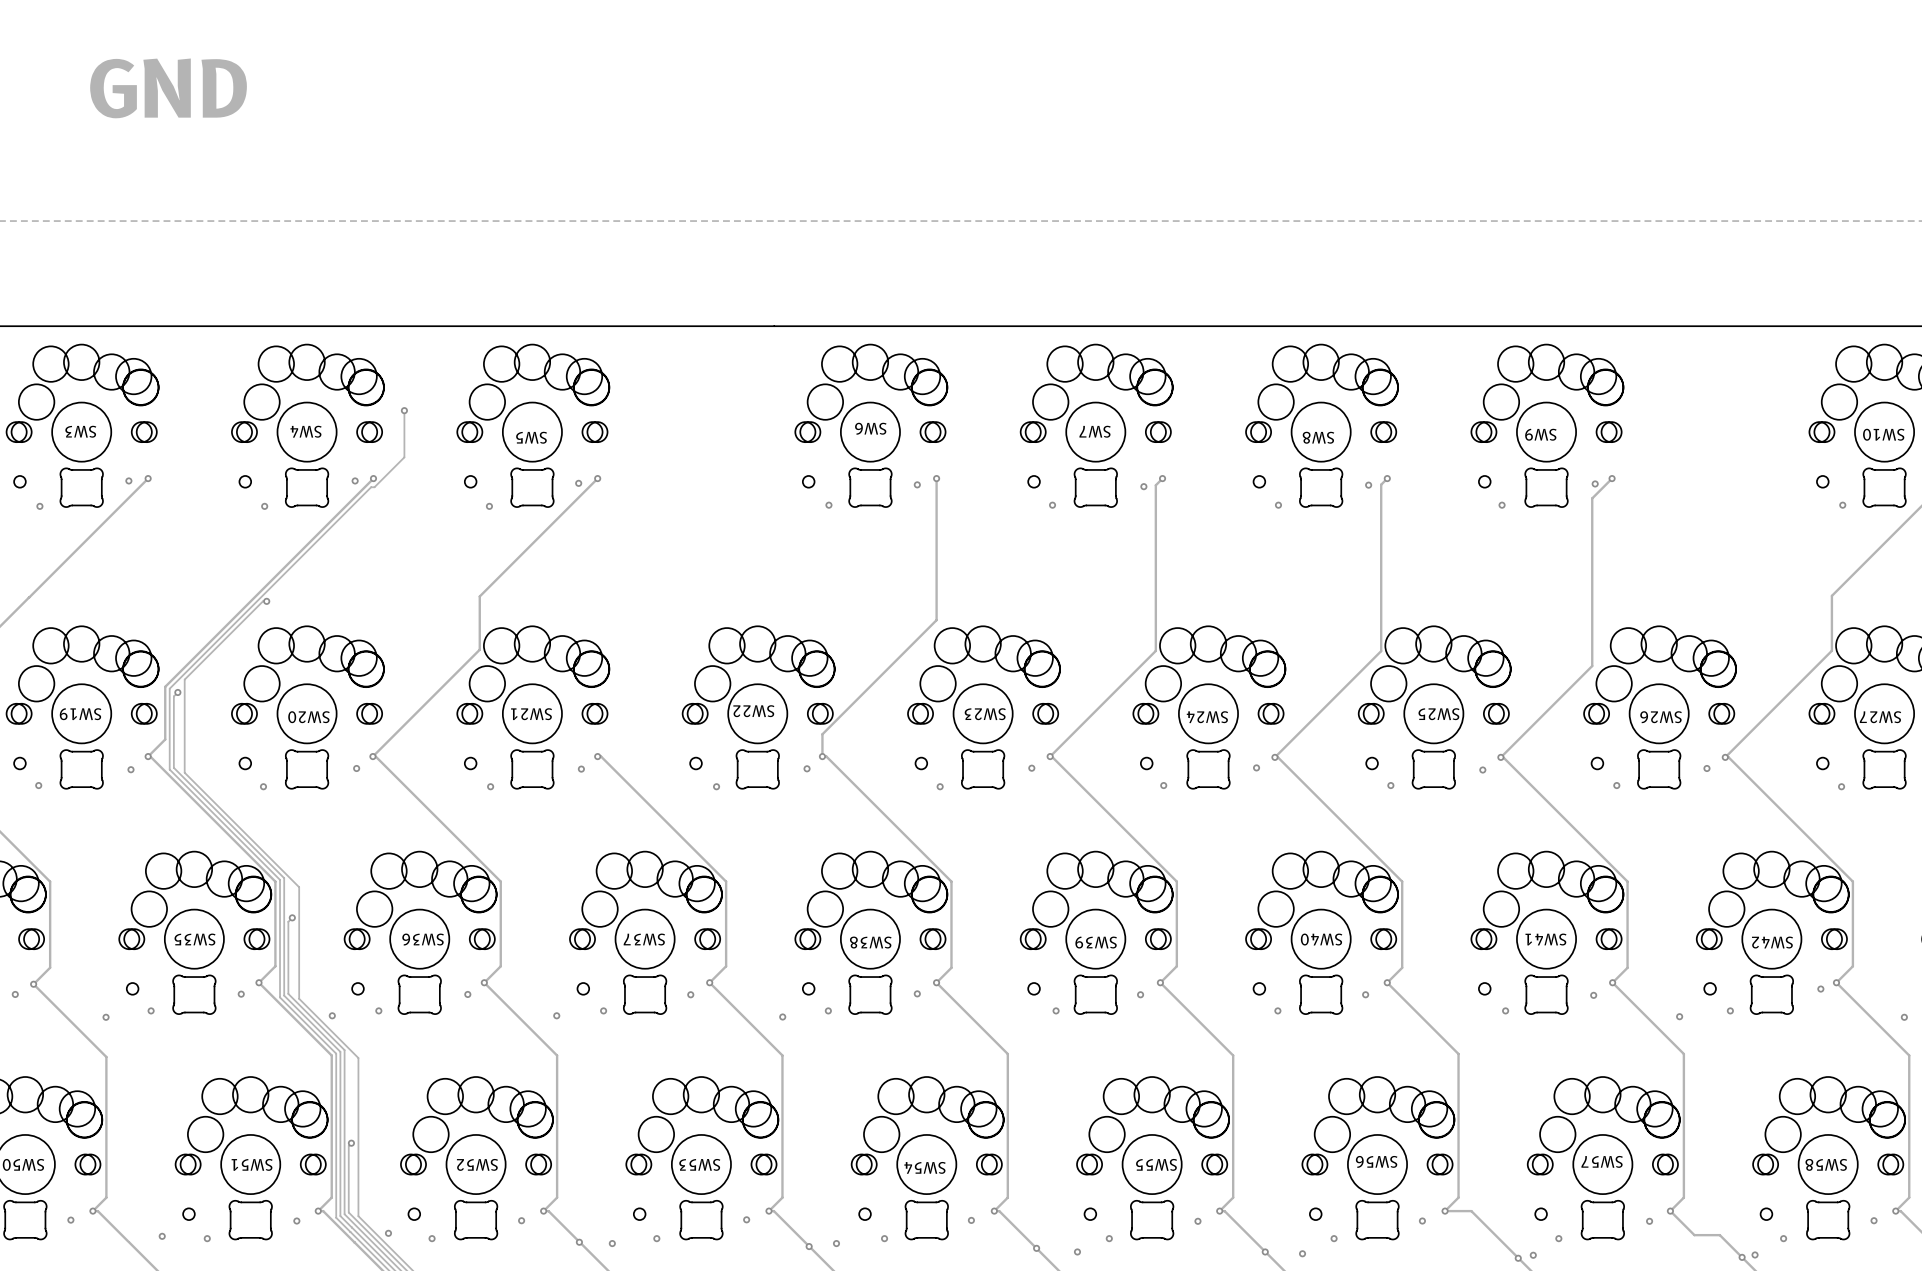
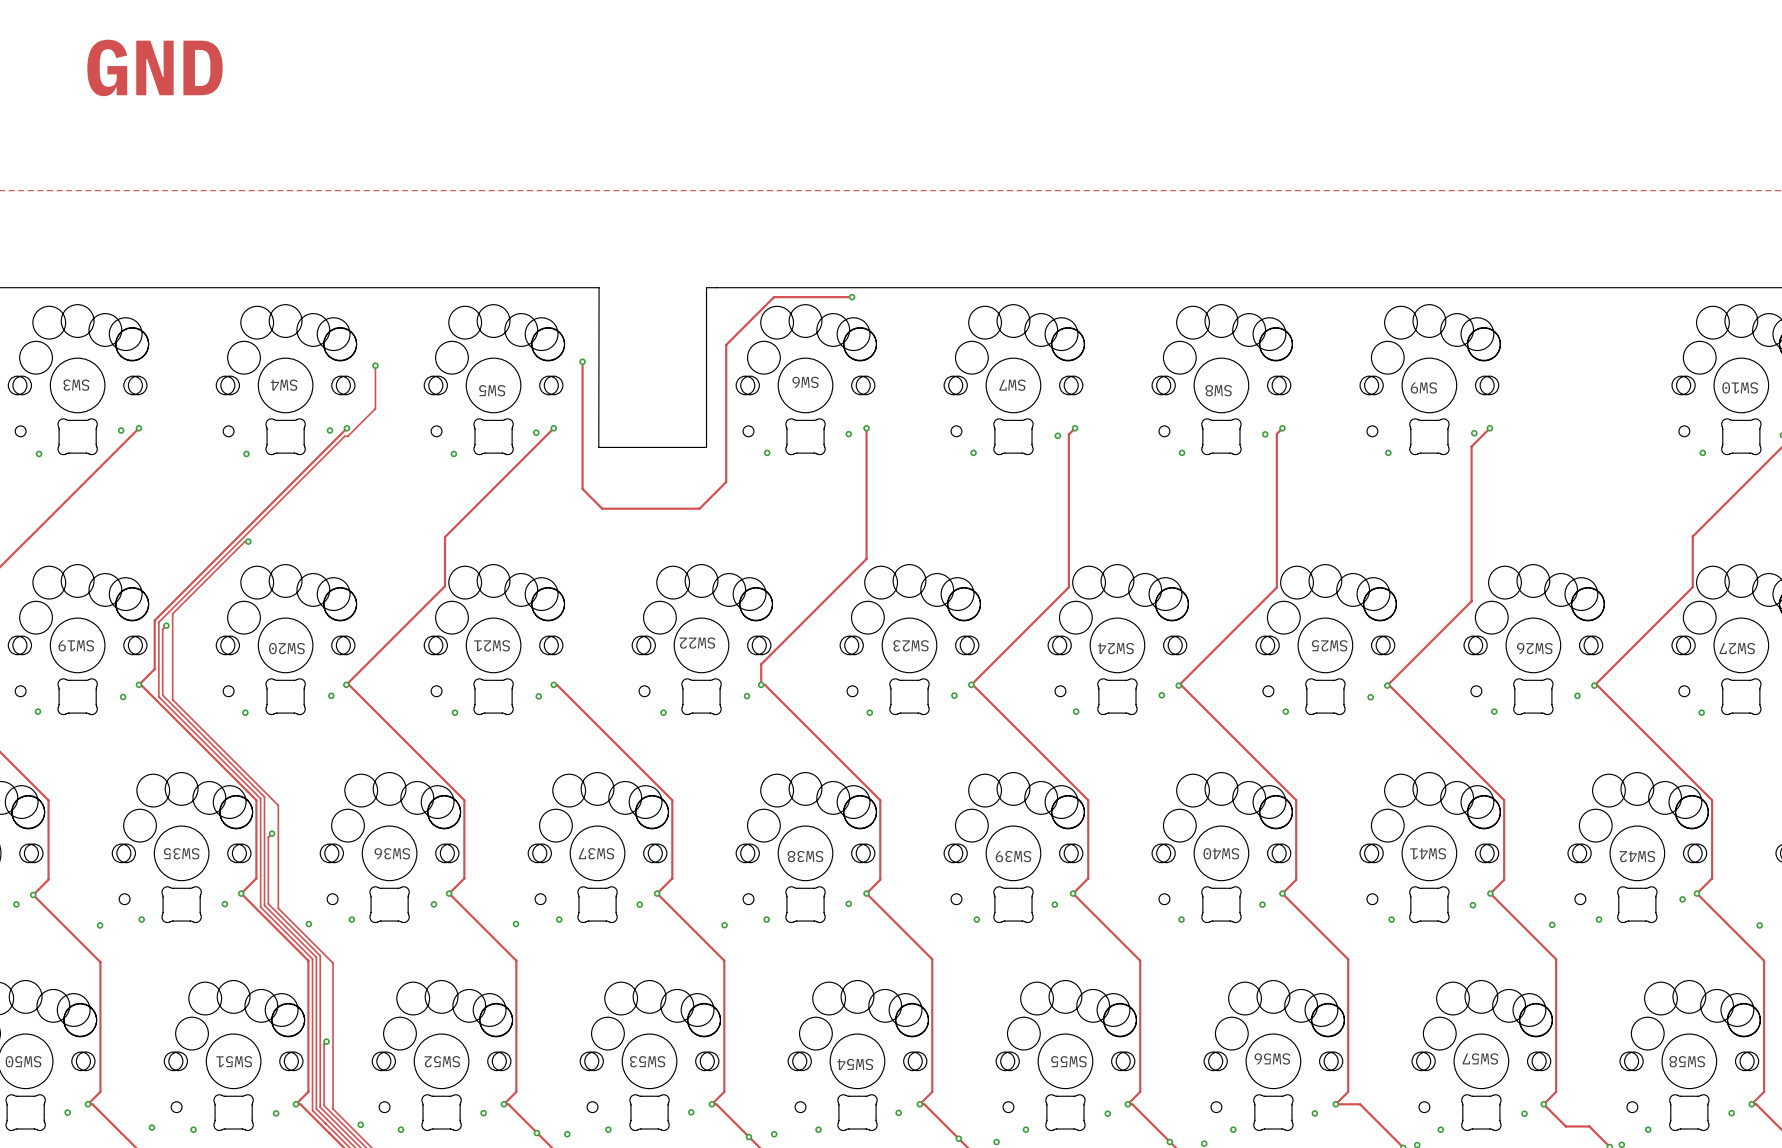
board edge: (646, 326) (763, 326) -> (599, 287) (598, 447) (706, 447) (706, 287)
track: none -> (852, 297) (774, 297) (726, 344) (726, 482) (699, 508) (602, 508) (582, 489) (582, 361)
via: none -> (852, 297)
via: none -> (582, 361)

